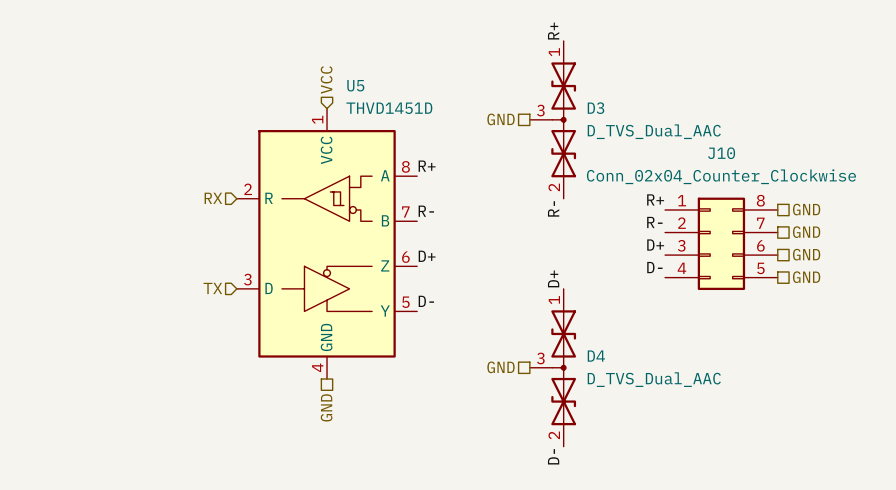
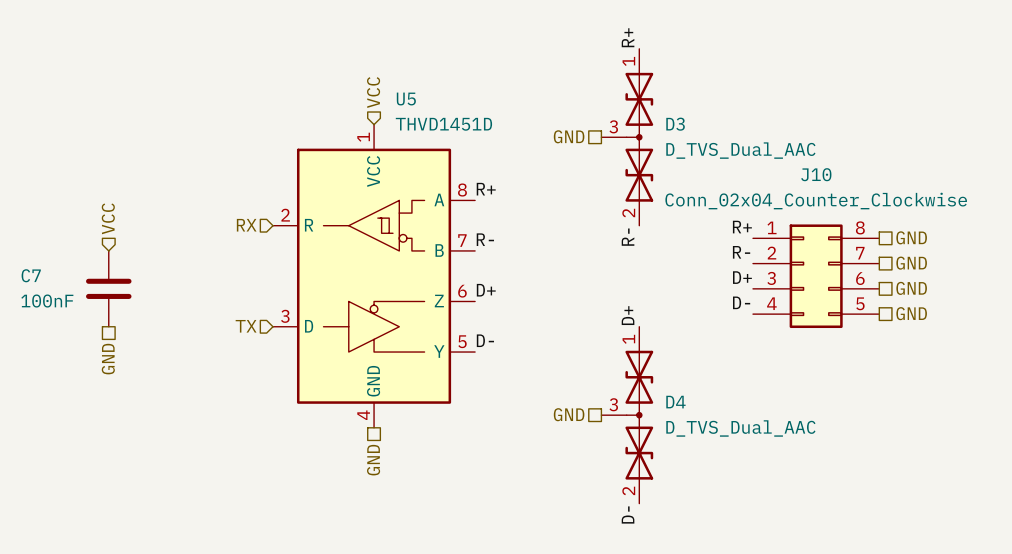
hierarchical label: none -> VCC (108, 218)
C7: none -> 100nF (108, 288)
hierarchical label: none -> GND (108, 359)

